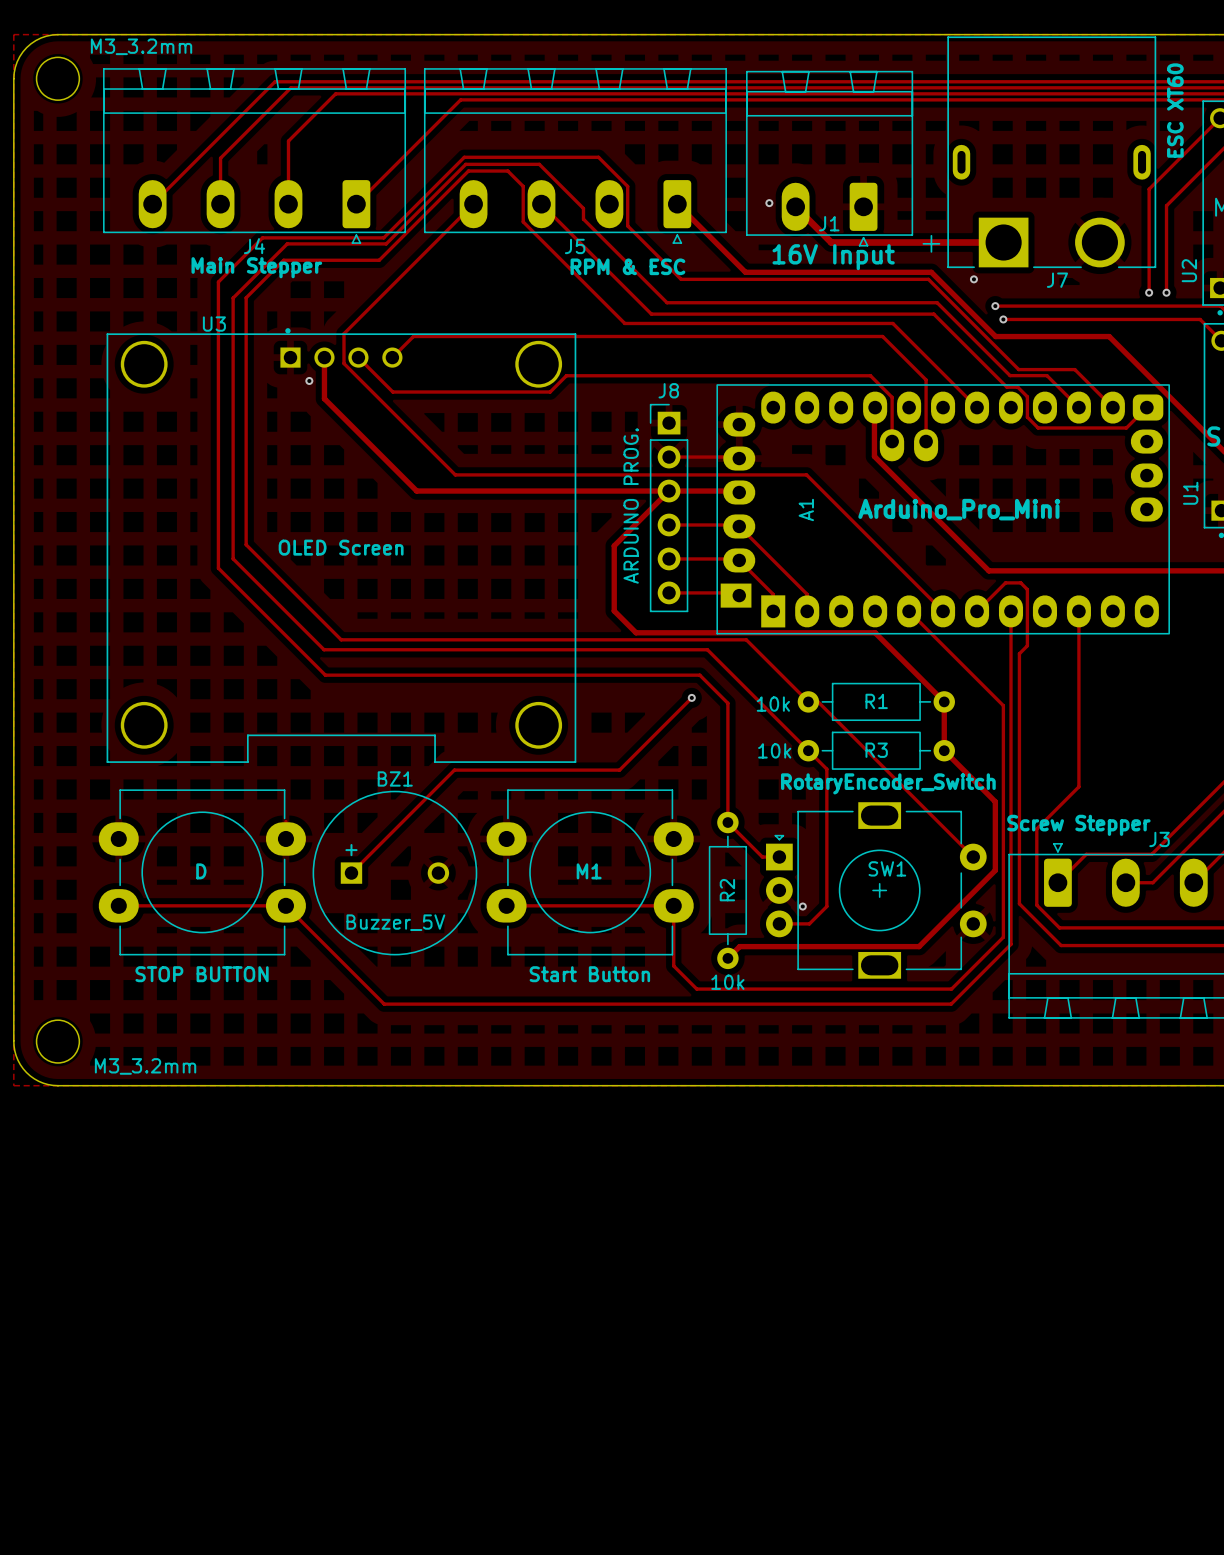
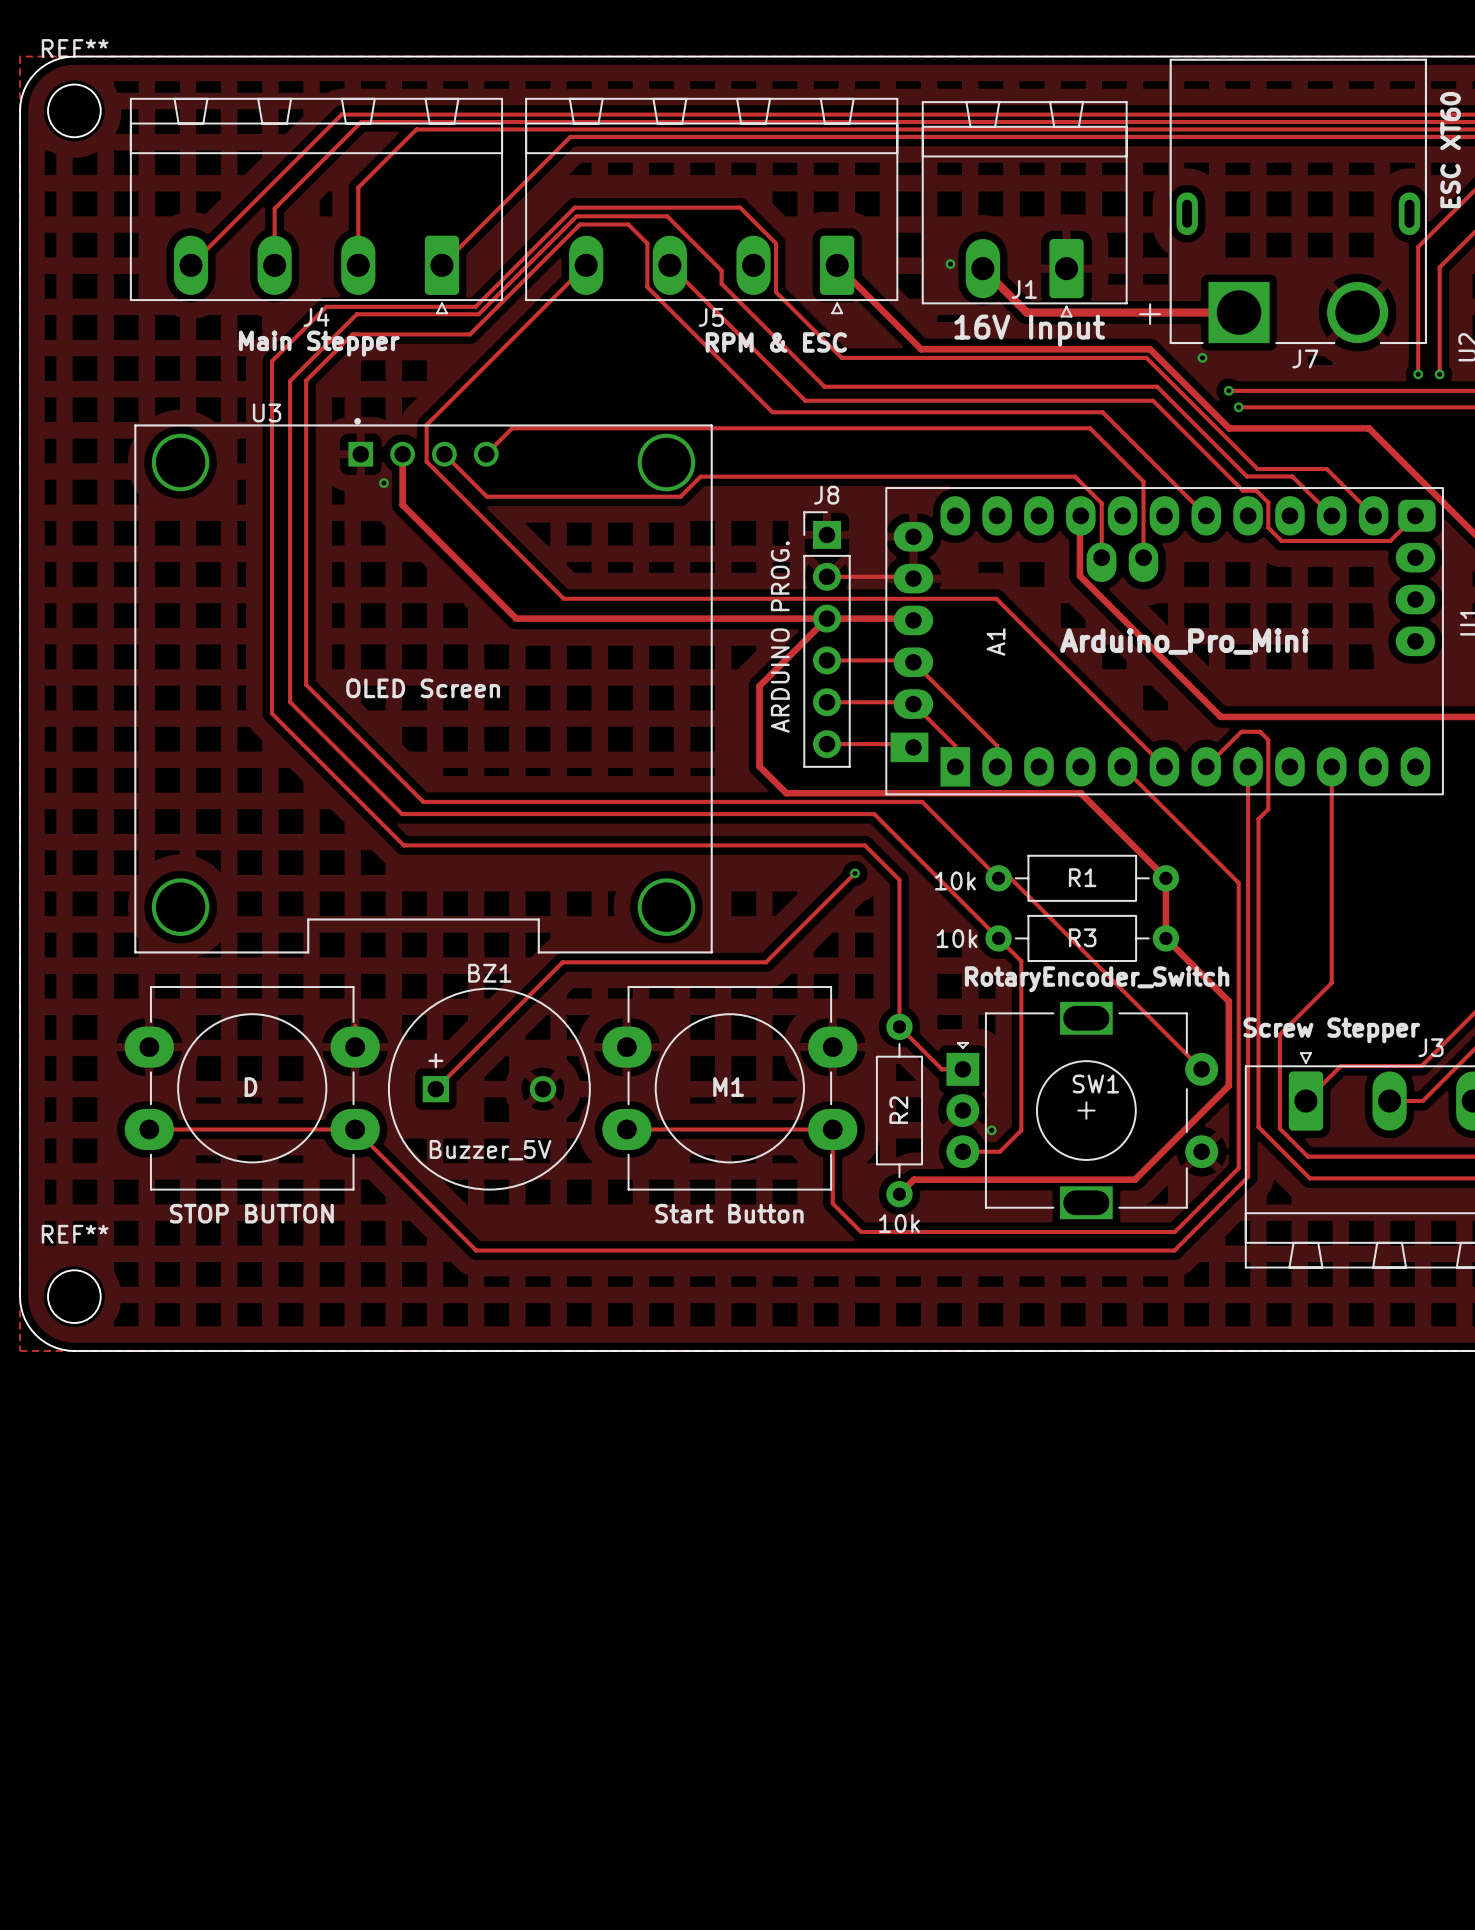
M3_3.2mm name: M3_3.2mm (141, 46) -> REF** (75, 48)
M3_3.2mm name: M3_3.2mm (145, 1066) -> REF** (75, 1234)

